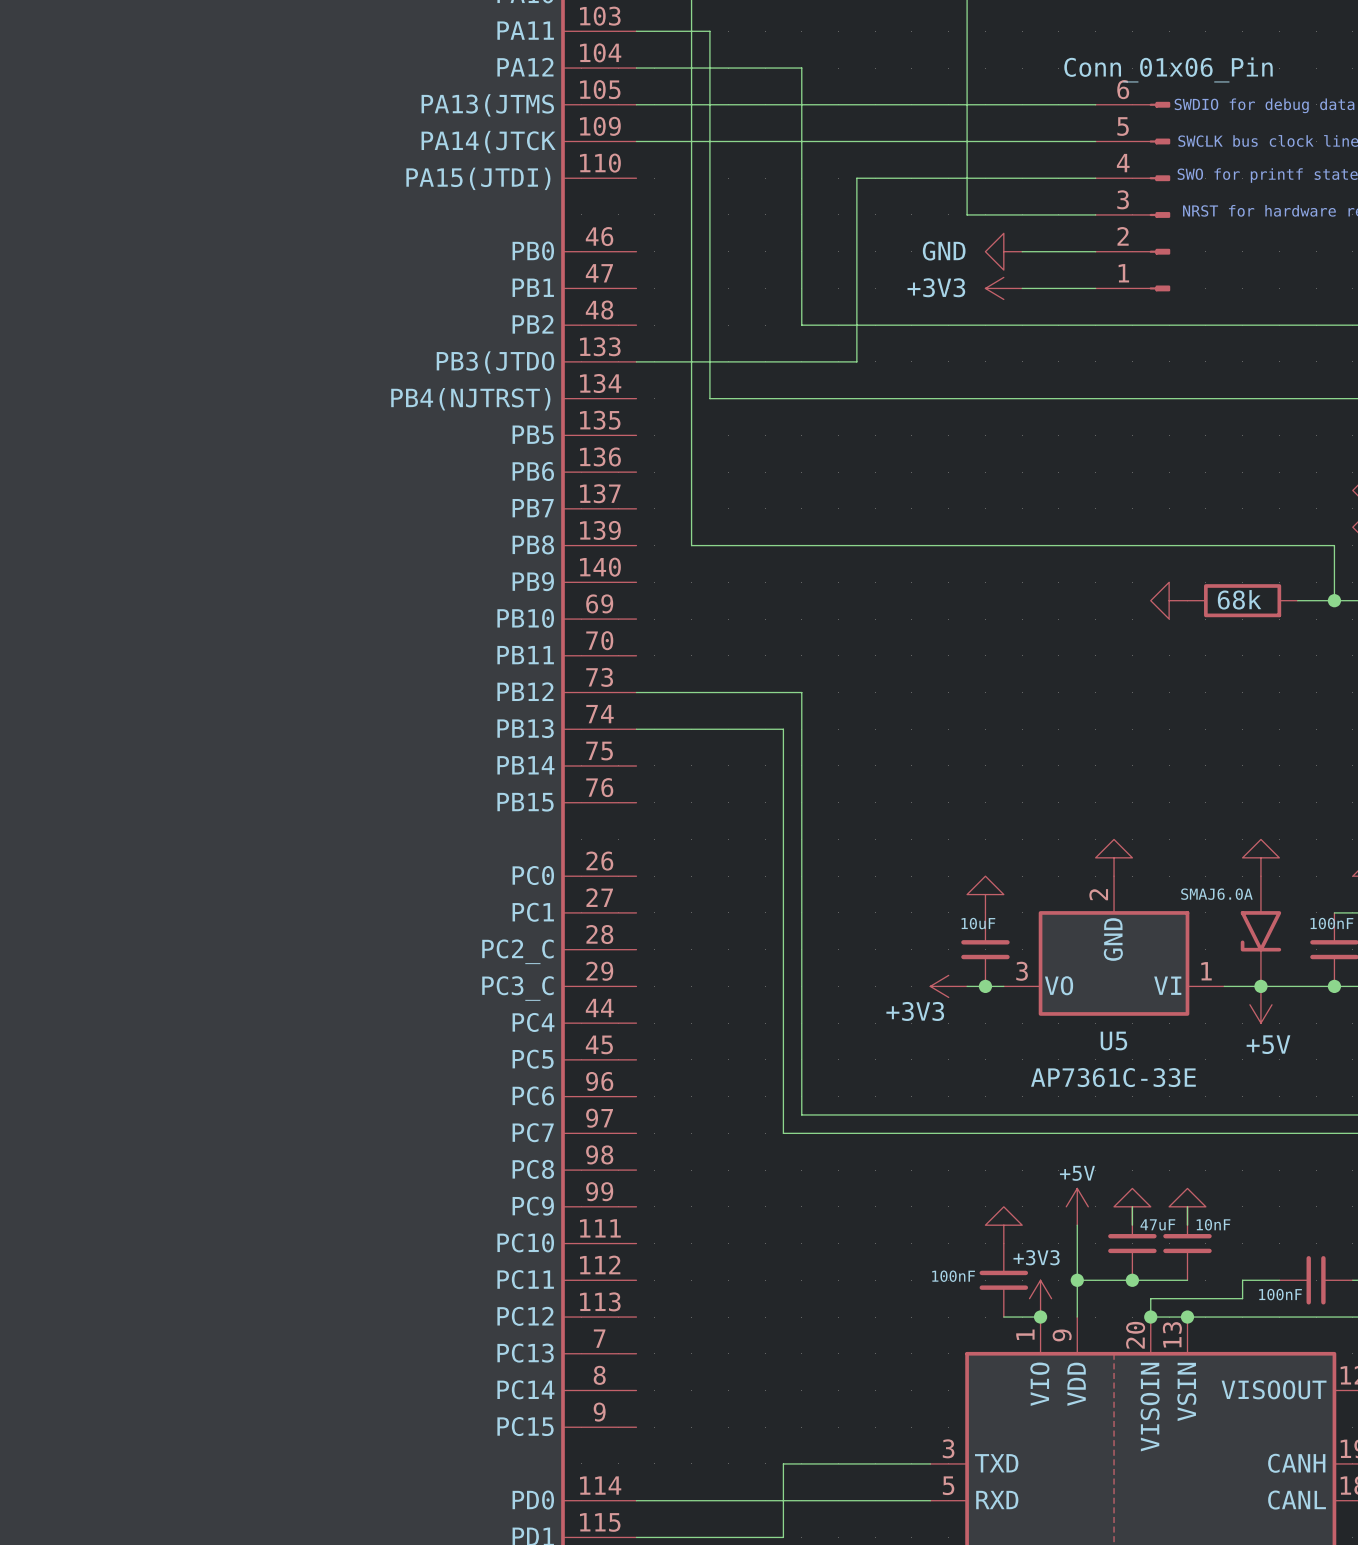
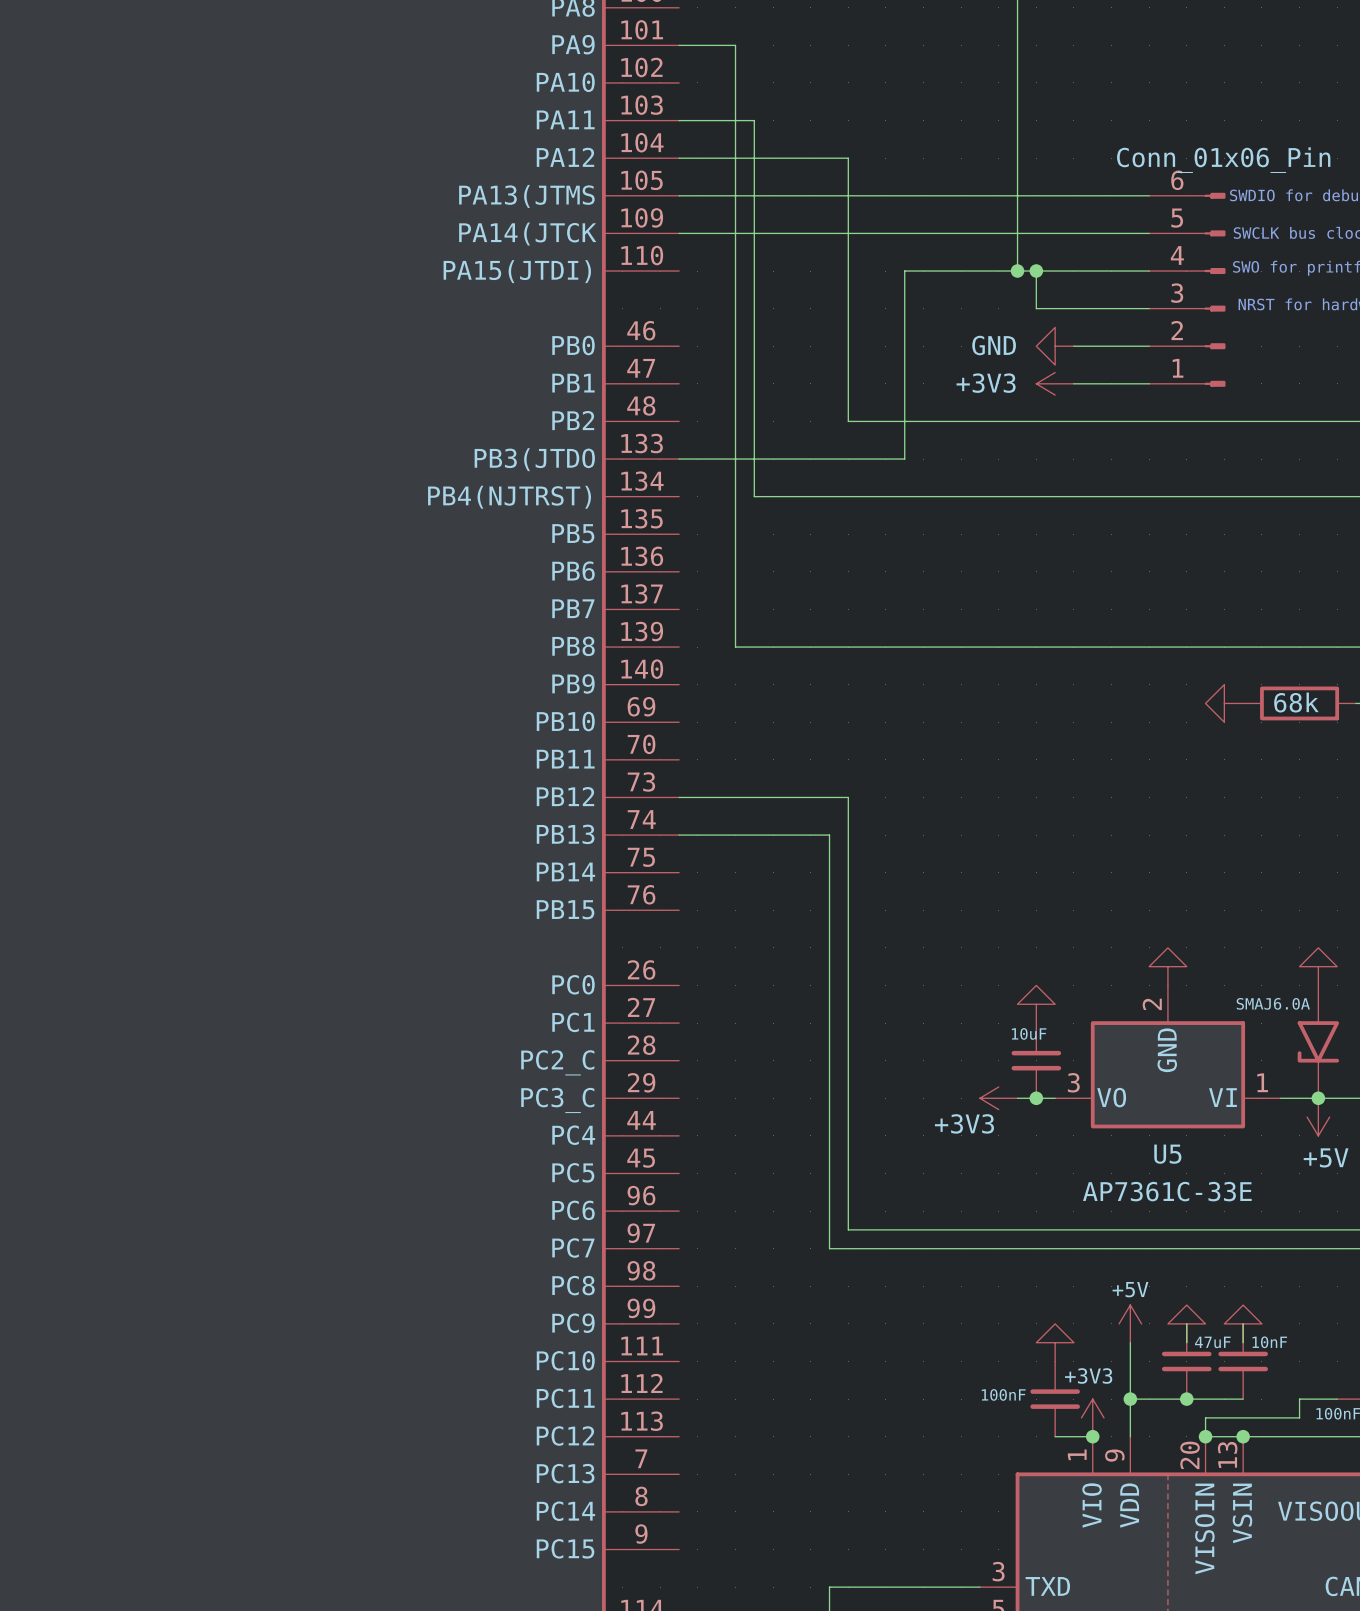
wire: (967, 178) (967, 214) (985, 214) -> (1036, 271) (1036, 308)
junction: none -> (1017, 271)
junction: none -> (1036, 271)

